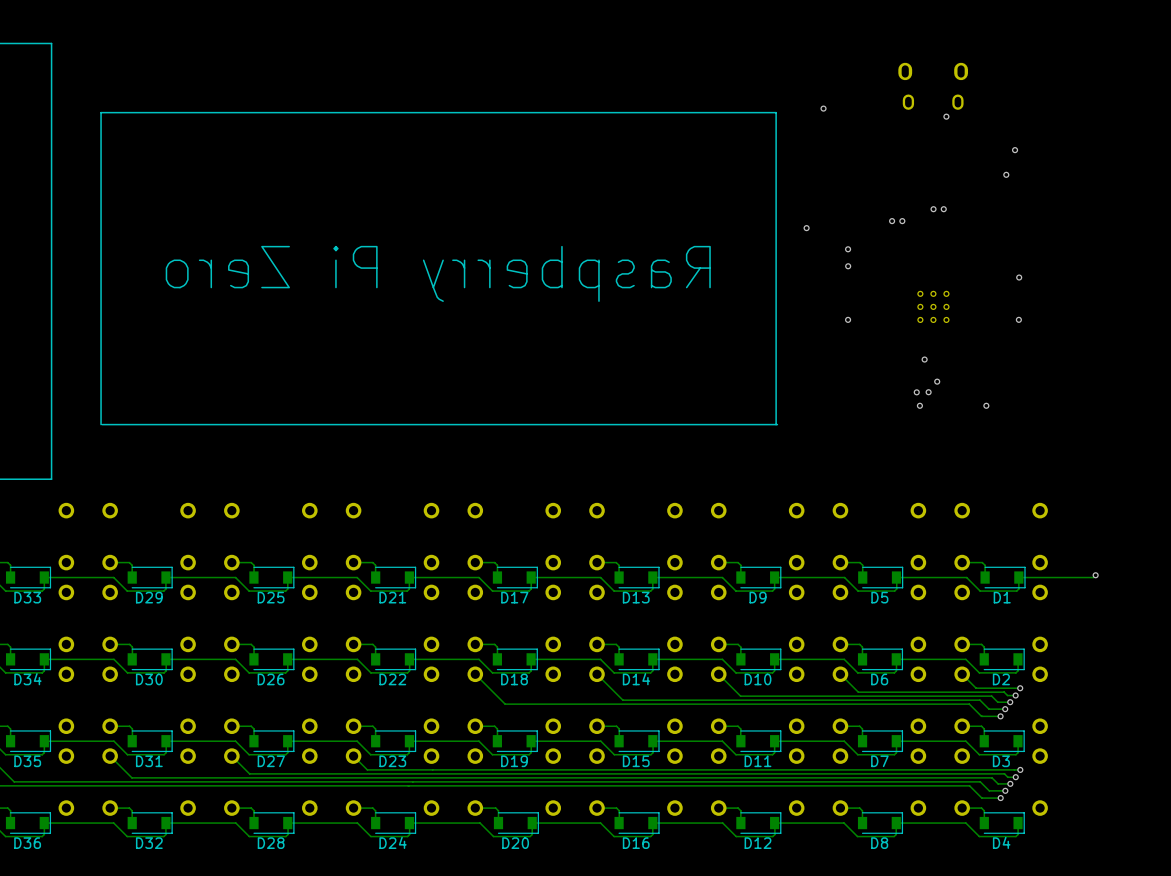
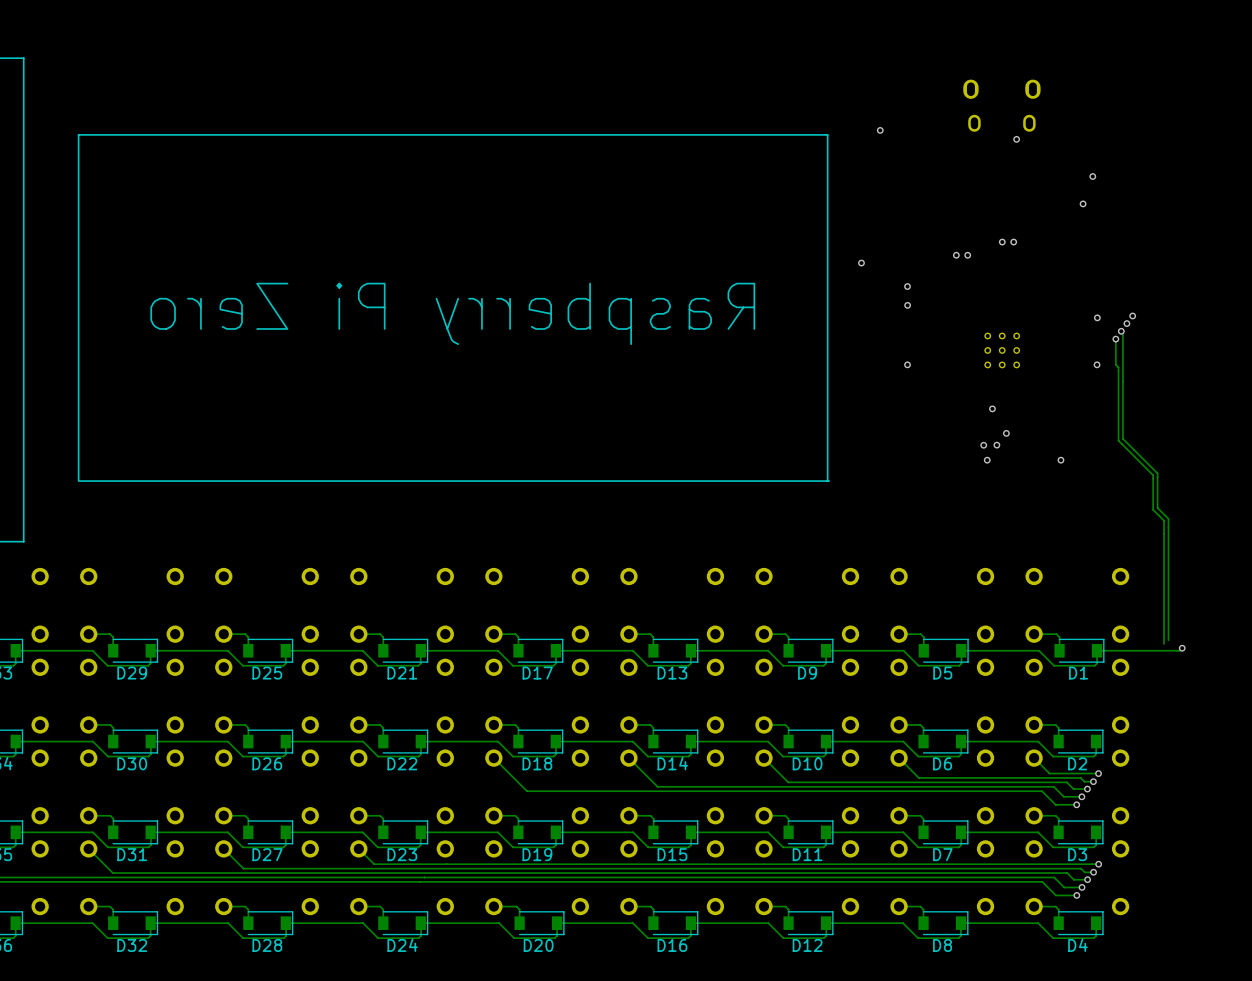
via: none -> (1132, 315)
via: none -> (1126, 323)
track: none -> (1121, 331) (1122, 332) (1122, 438) (1157, 473) (1157, 507) (1168, 518) (1168, 640)
via: none -> (1121, 331)
track: none -> (1115, 339) (1115, 364) (1118, 367) (1118, 440) (1153, 475) (1153, 509) (1164, 520) (1164, 643)
via: none -> (1115, 339)

